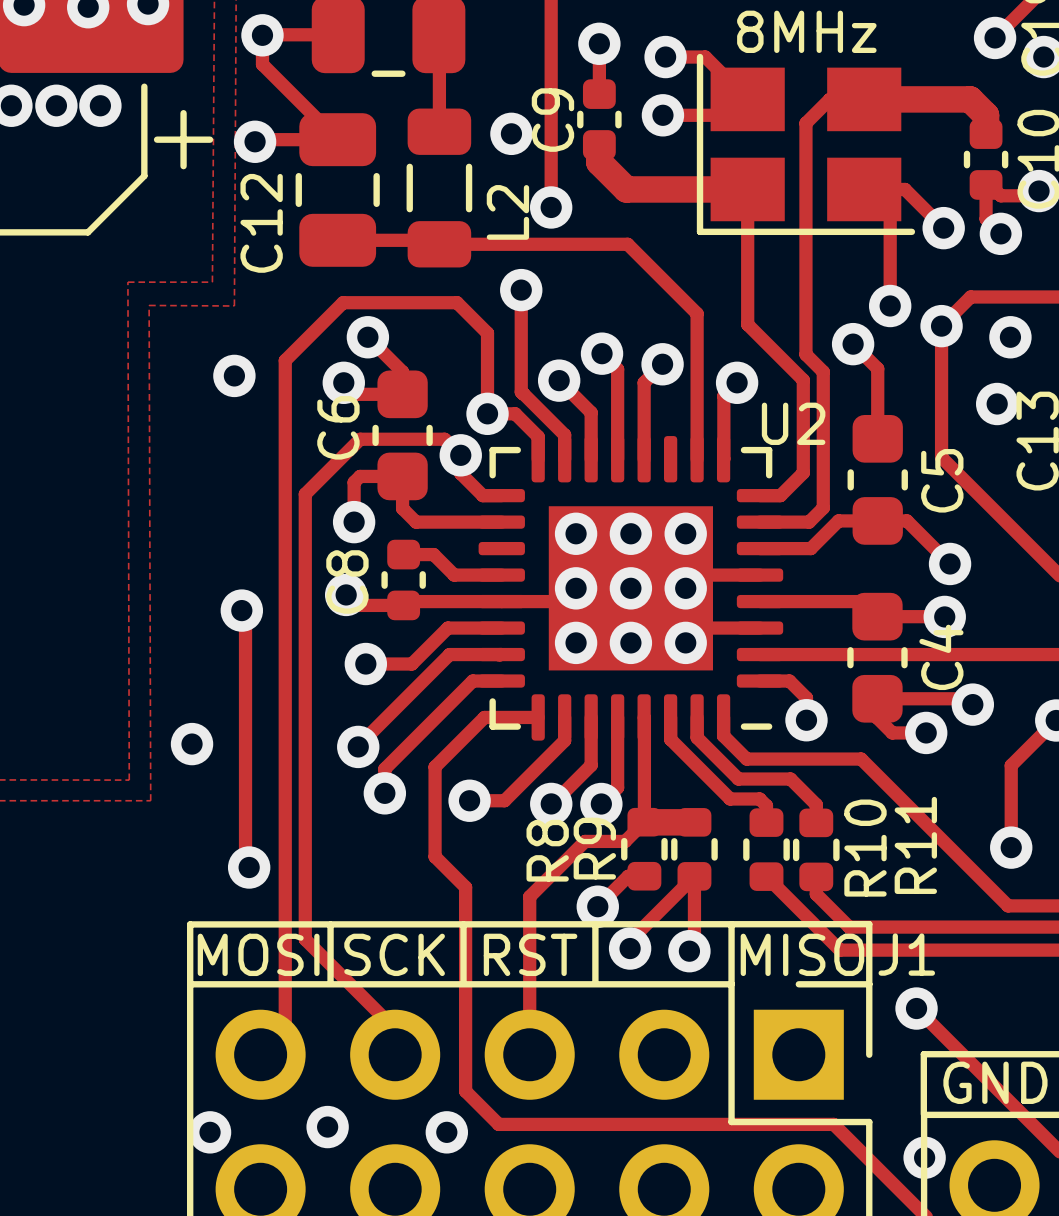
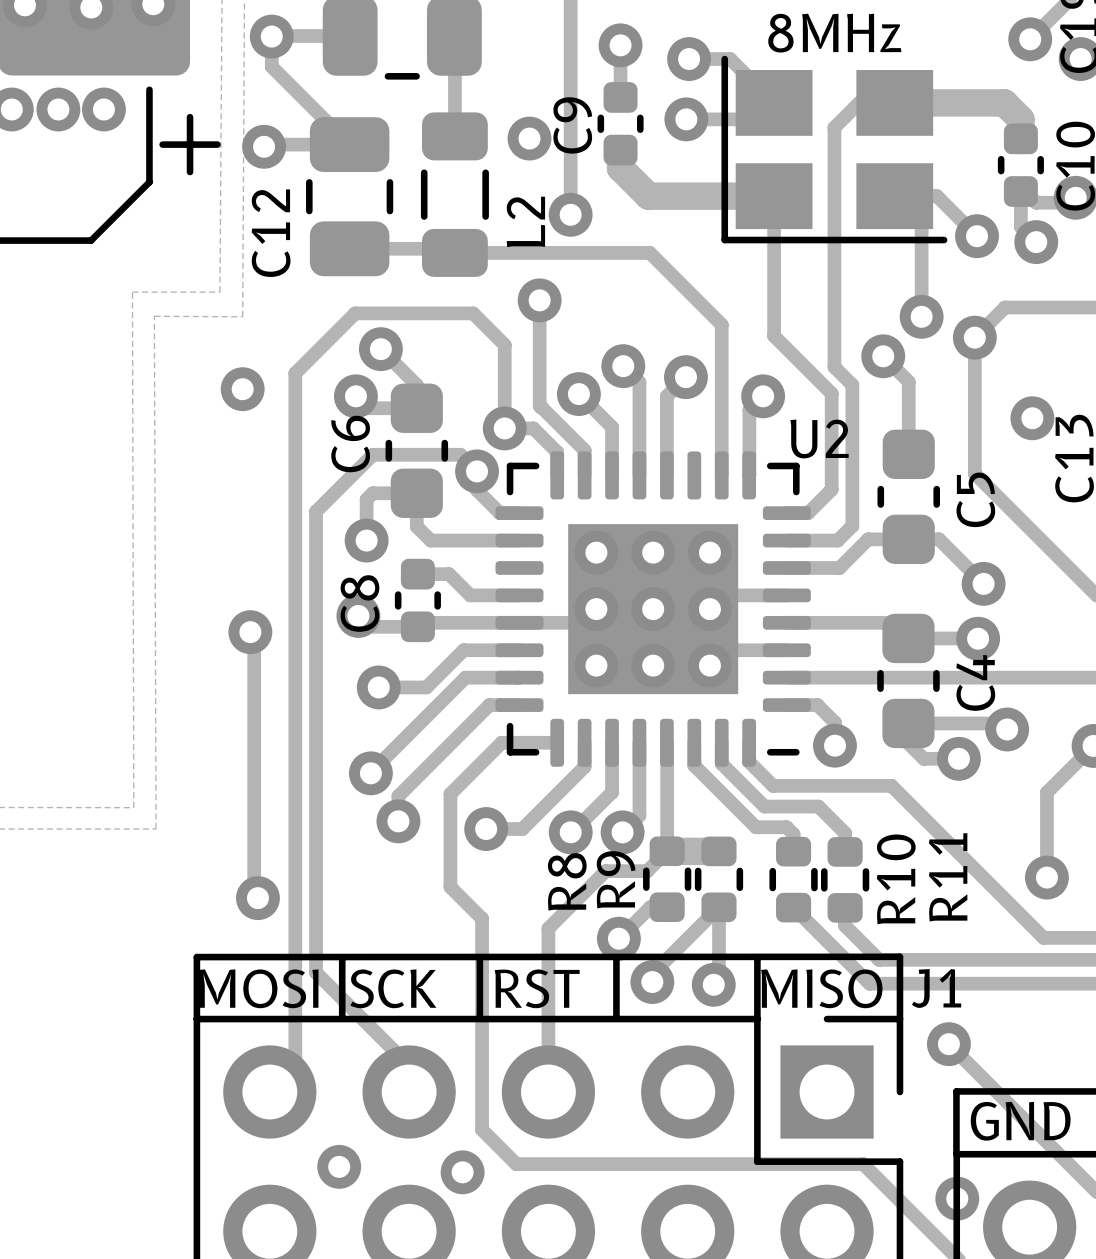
via: (1010, 337) -> none
via: (192, 744) -> none
via: (210, 1132) -> none

